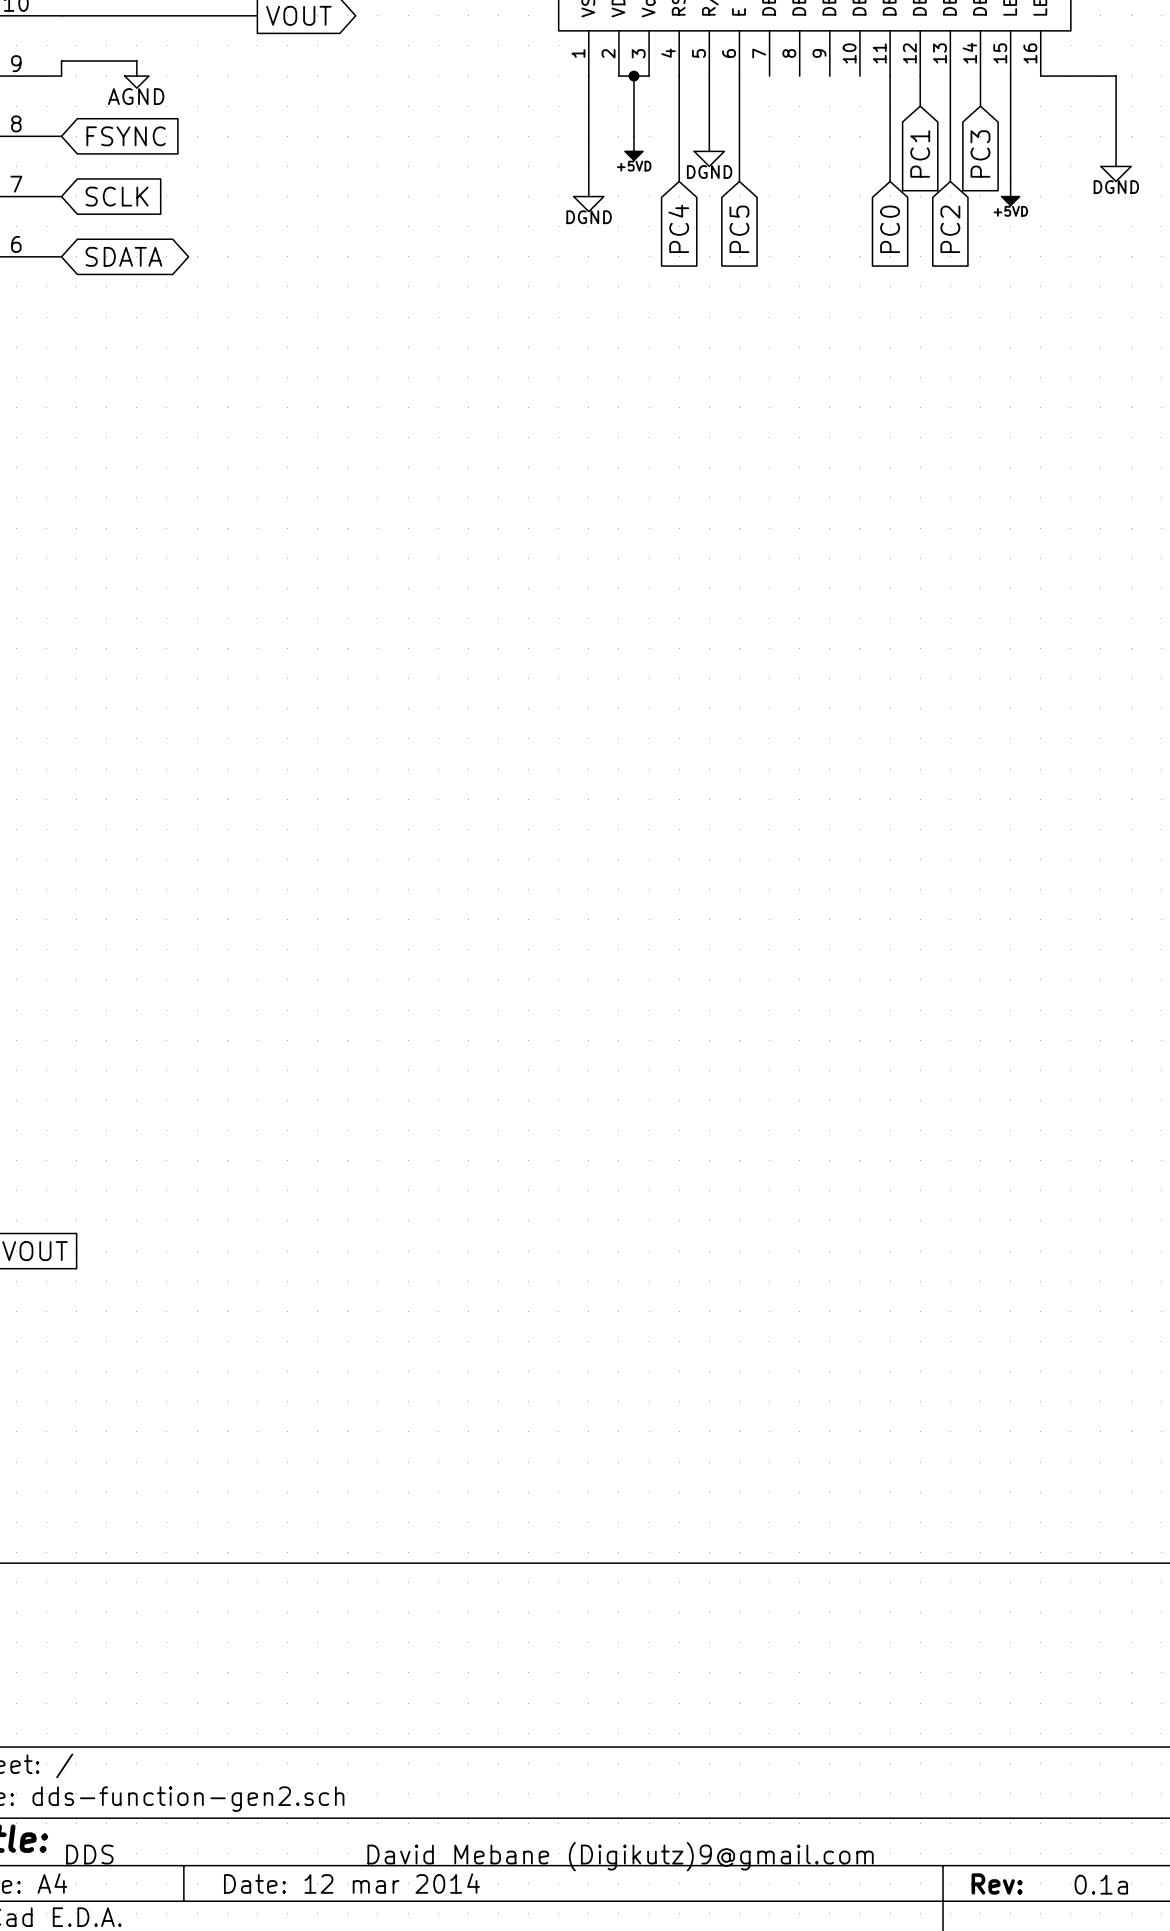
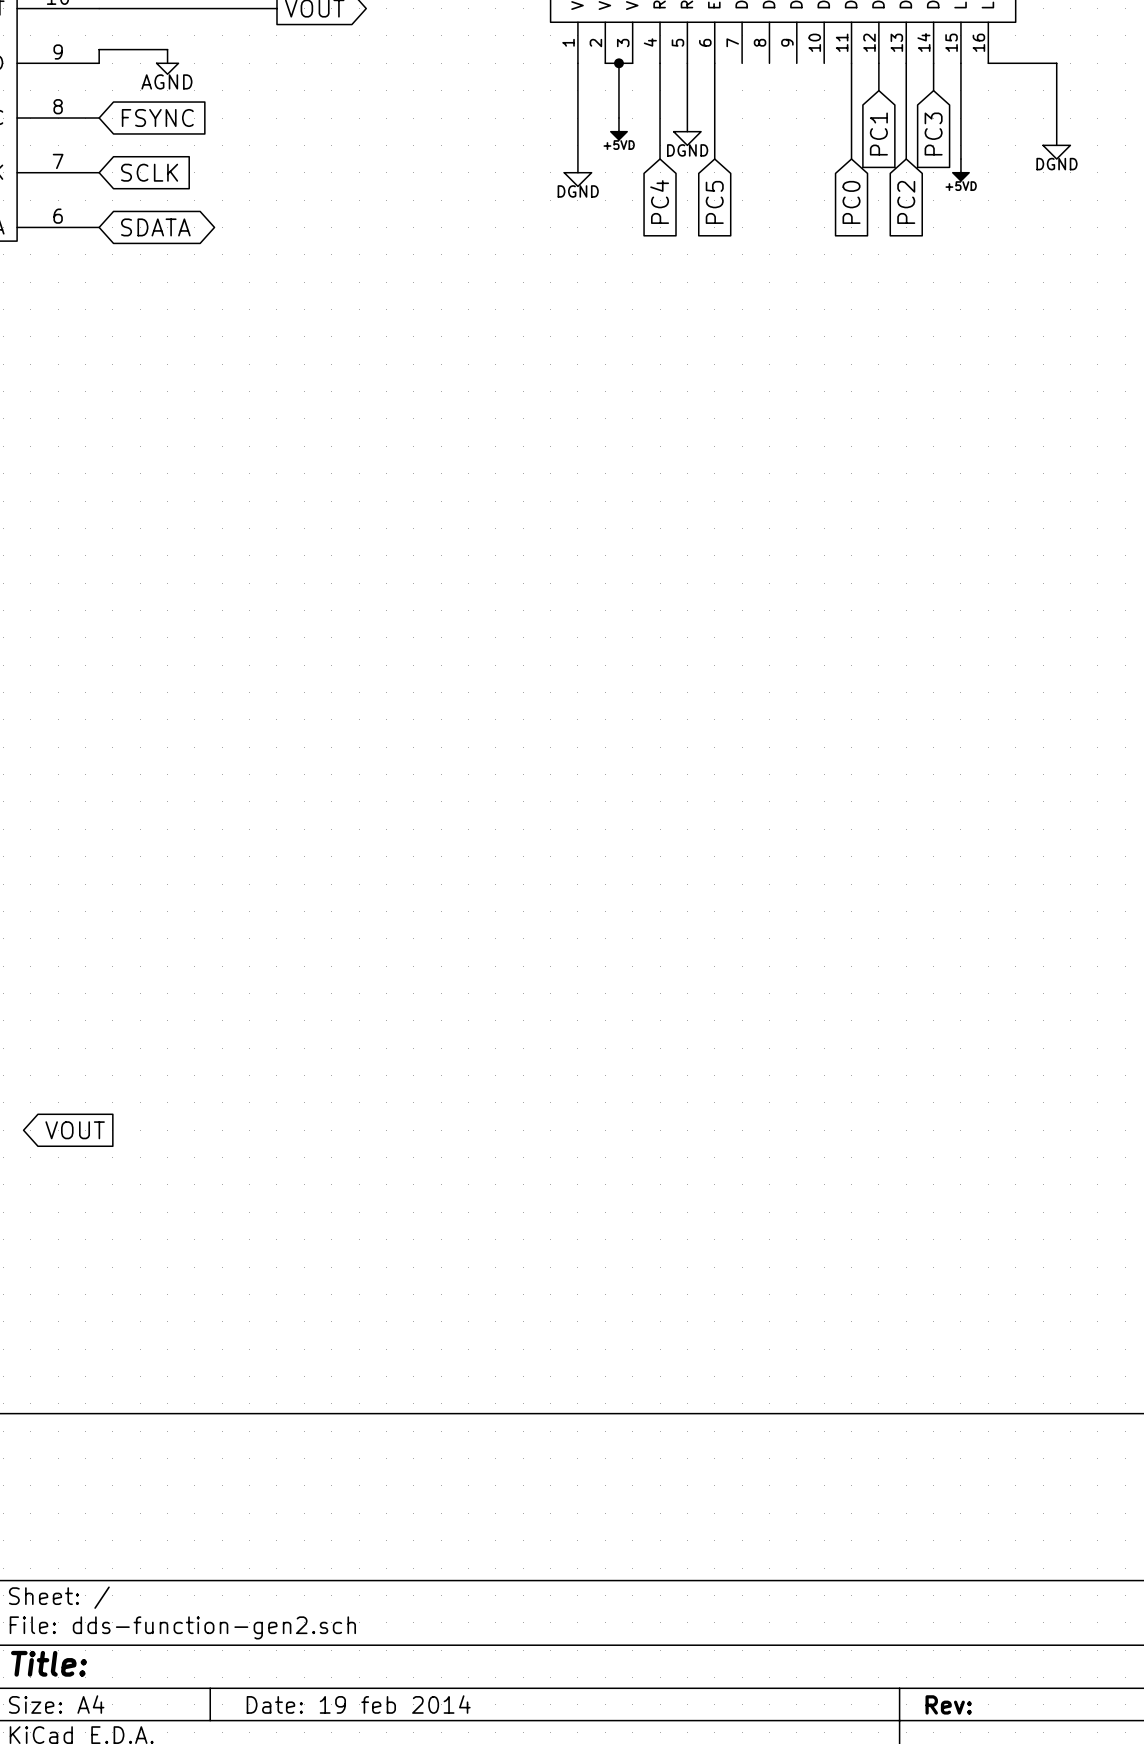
text: DDS David Mebane (Digikutz)9@gmail.com (469, 1856) -> none
title block: Date: 12 mar 2014 (351, 1883) -> Date: 19 feb 2014 (358, 1704)
text: 0.1a (1101, 1884) -> none

